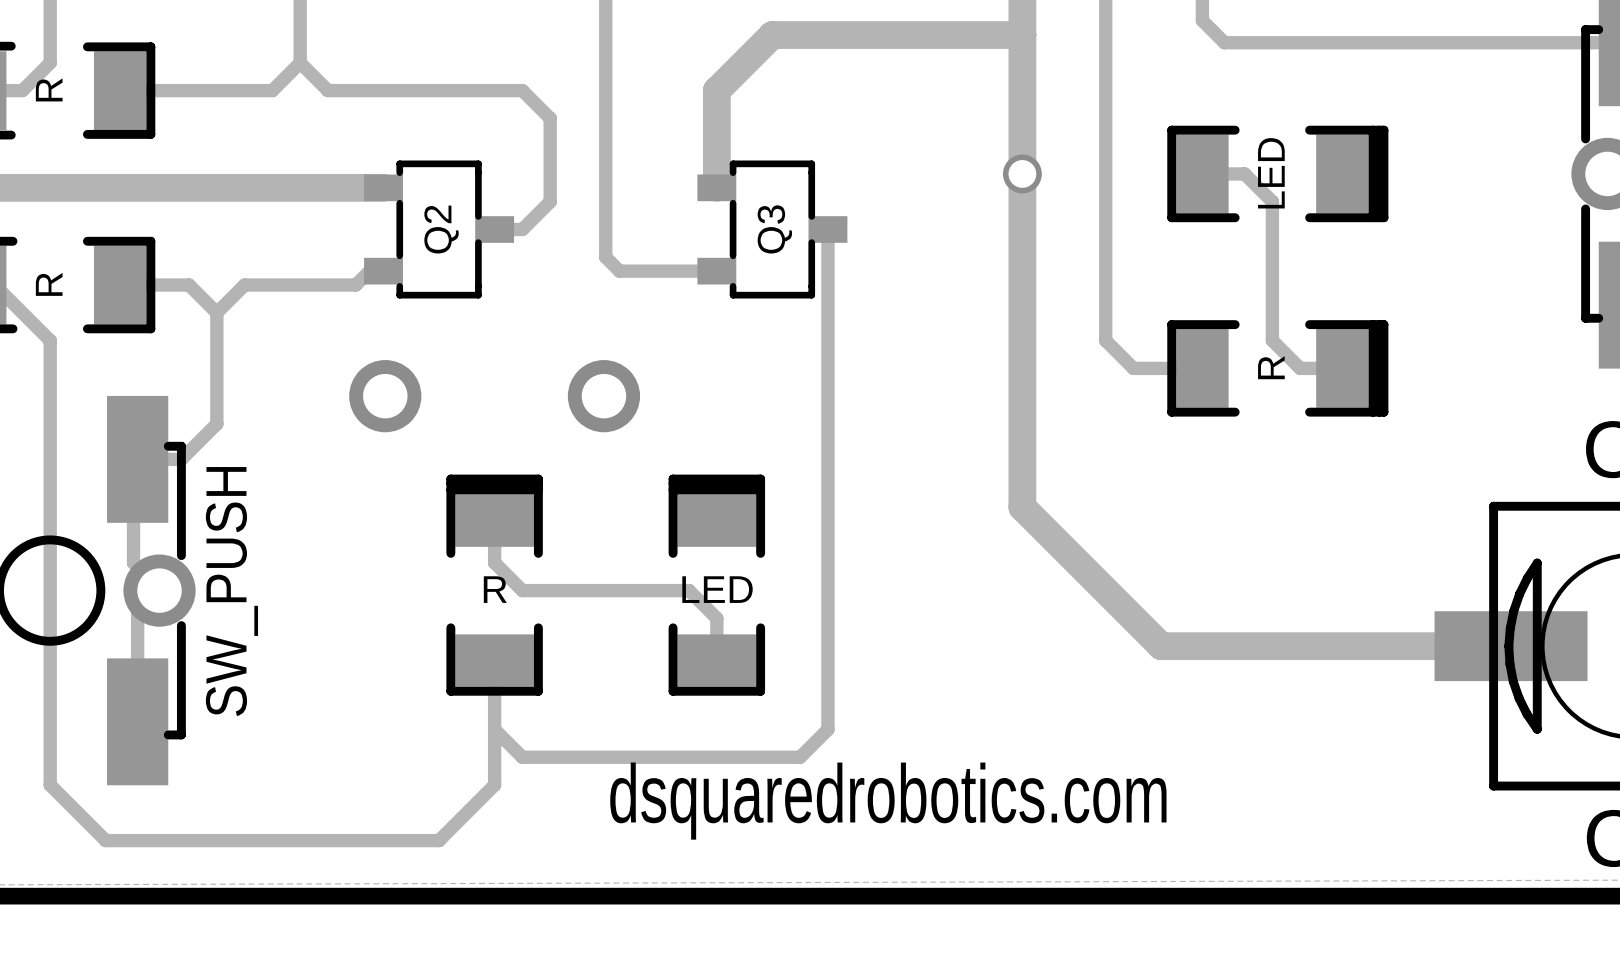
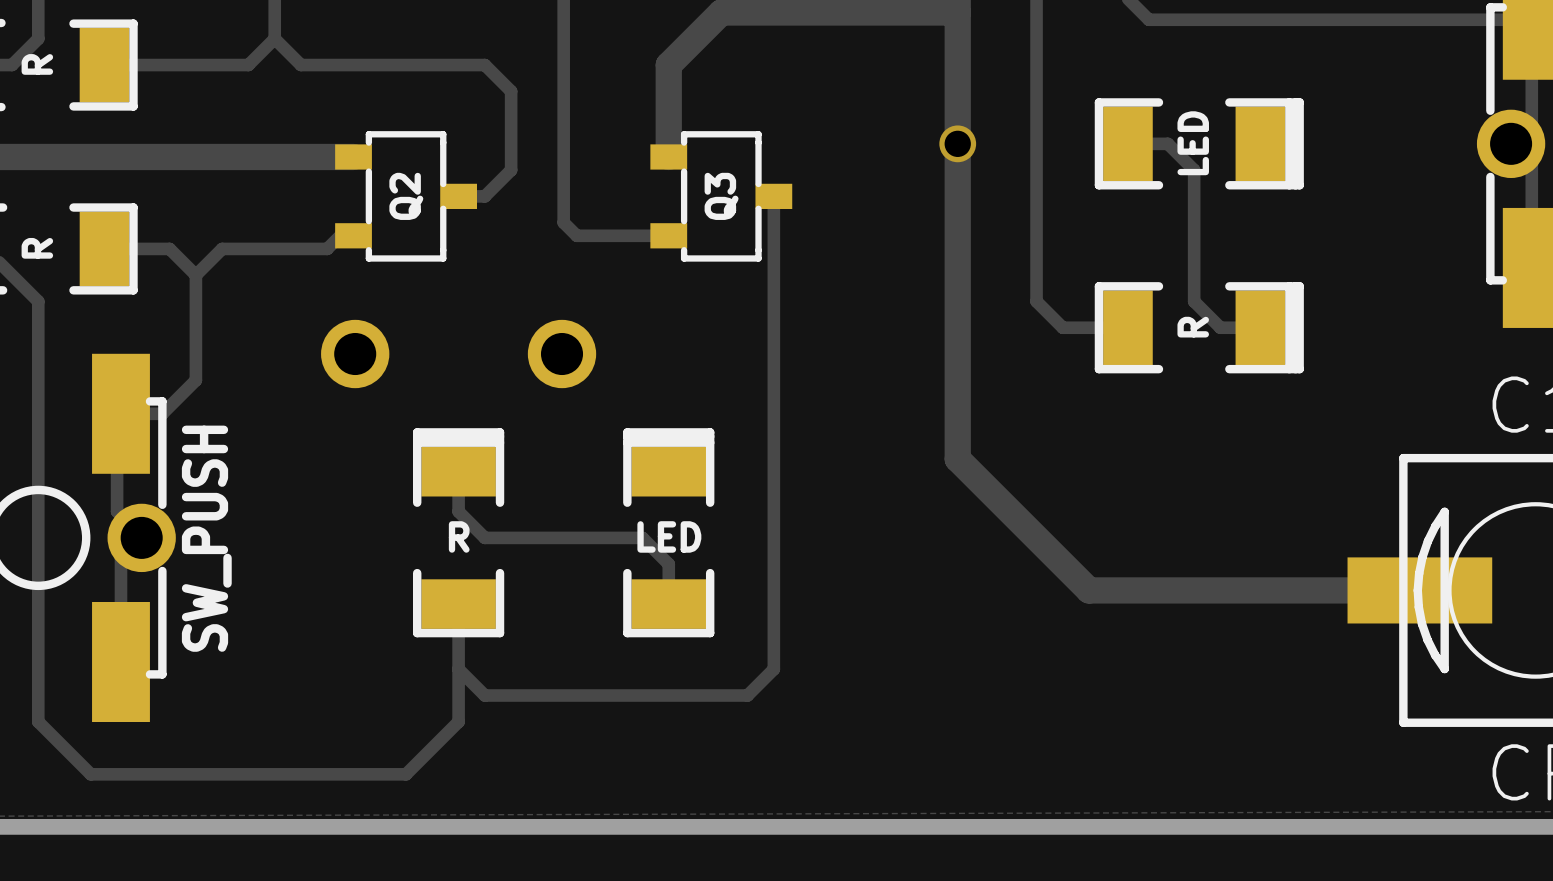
text: dsquaredrobotics.com (888, 801) -> none

